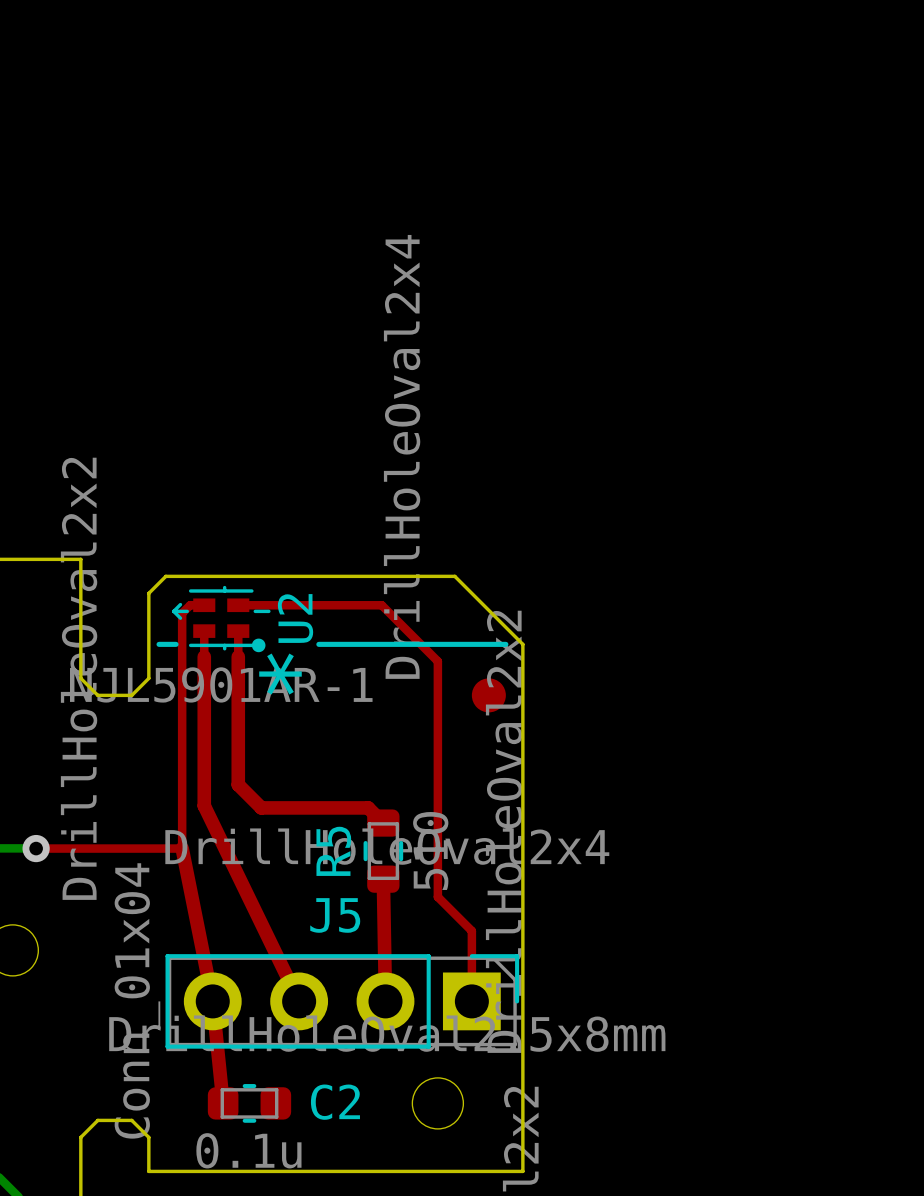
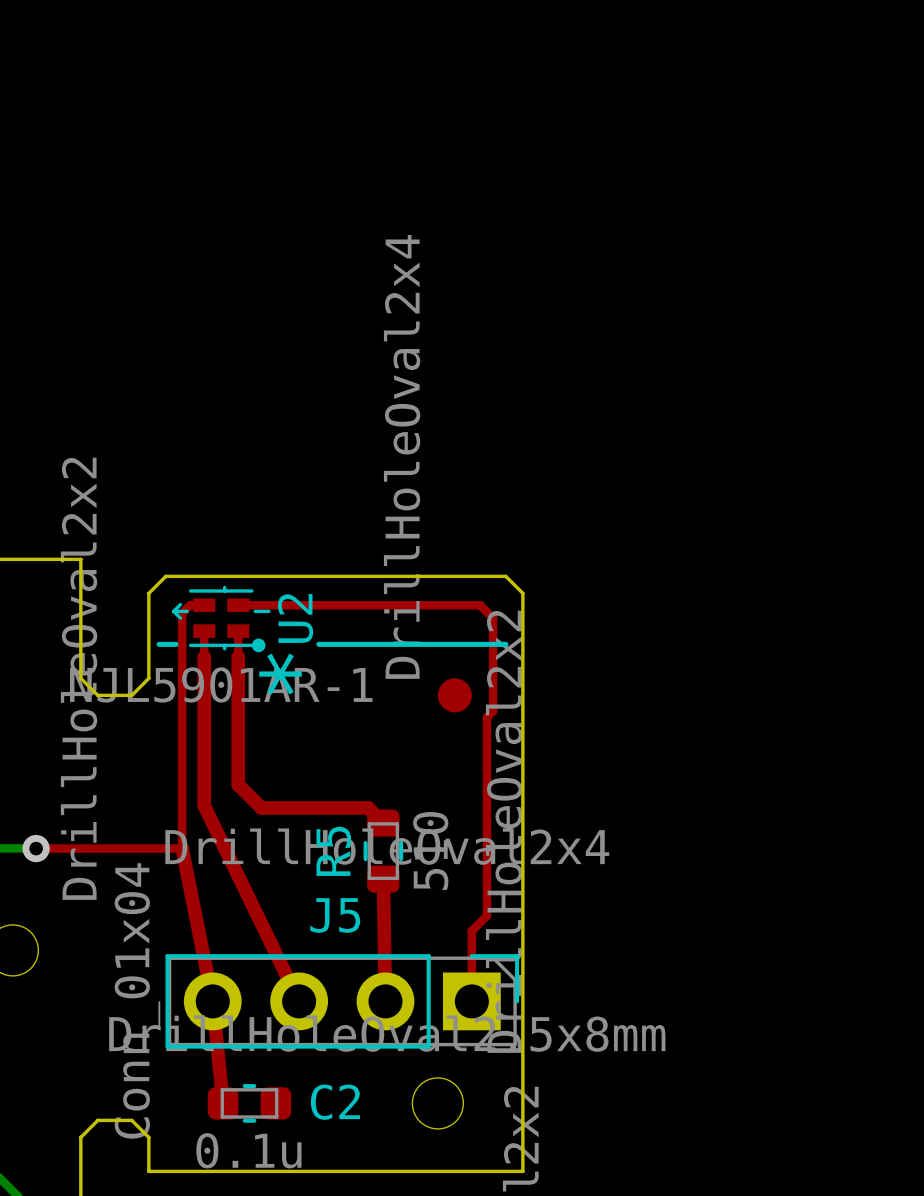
board edge: (454, 576) (522, 644) -> (454, 576) (505, 576) (522, 593) (522, 644)
top track: (381, 605) (437, 661) (437, 897) (471, 931) -> (381, 605) (480, 605) (493, 618) (493, 711) (487, 717) (487, 915) (471, 931)
part position: (488, 695) -> (454, 695)

